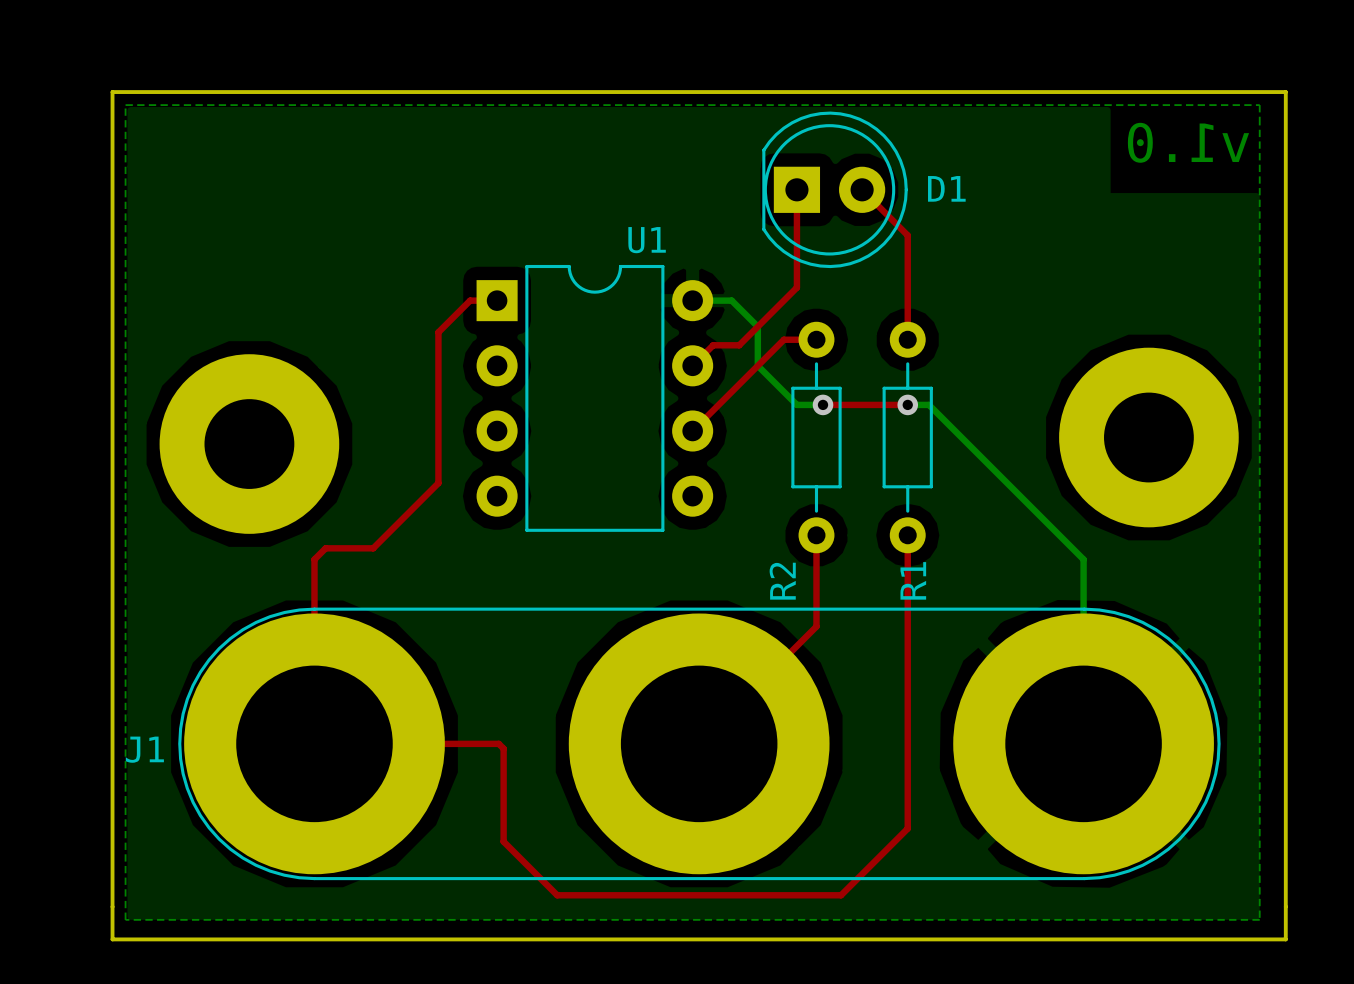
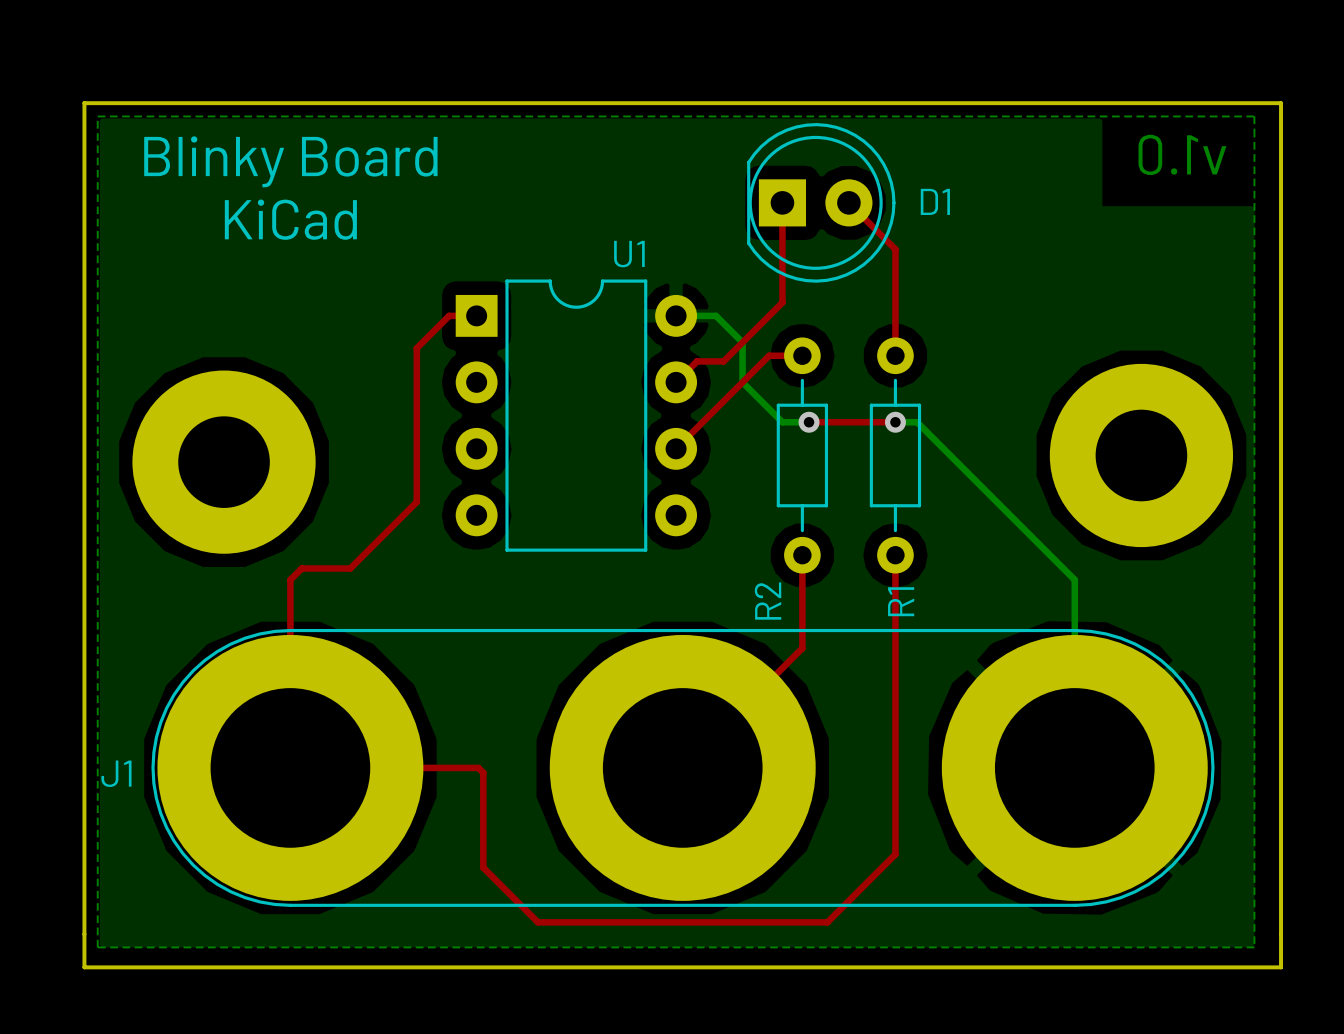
text: none -> Blinky Board (290, 161)
text: none -> KiCad (290, 219)

